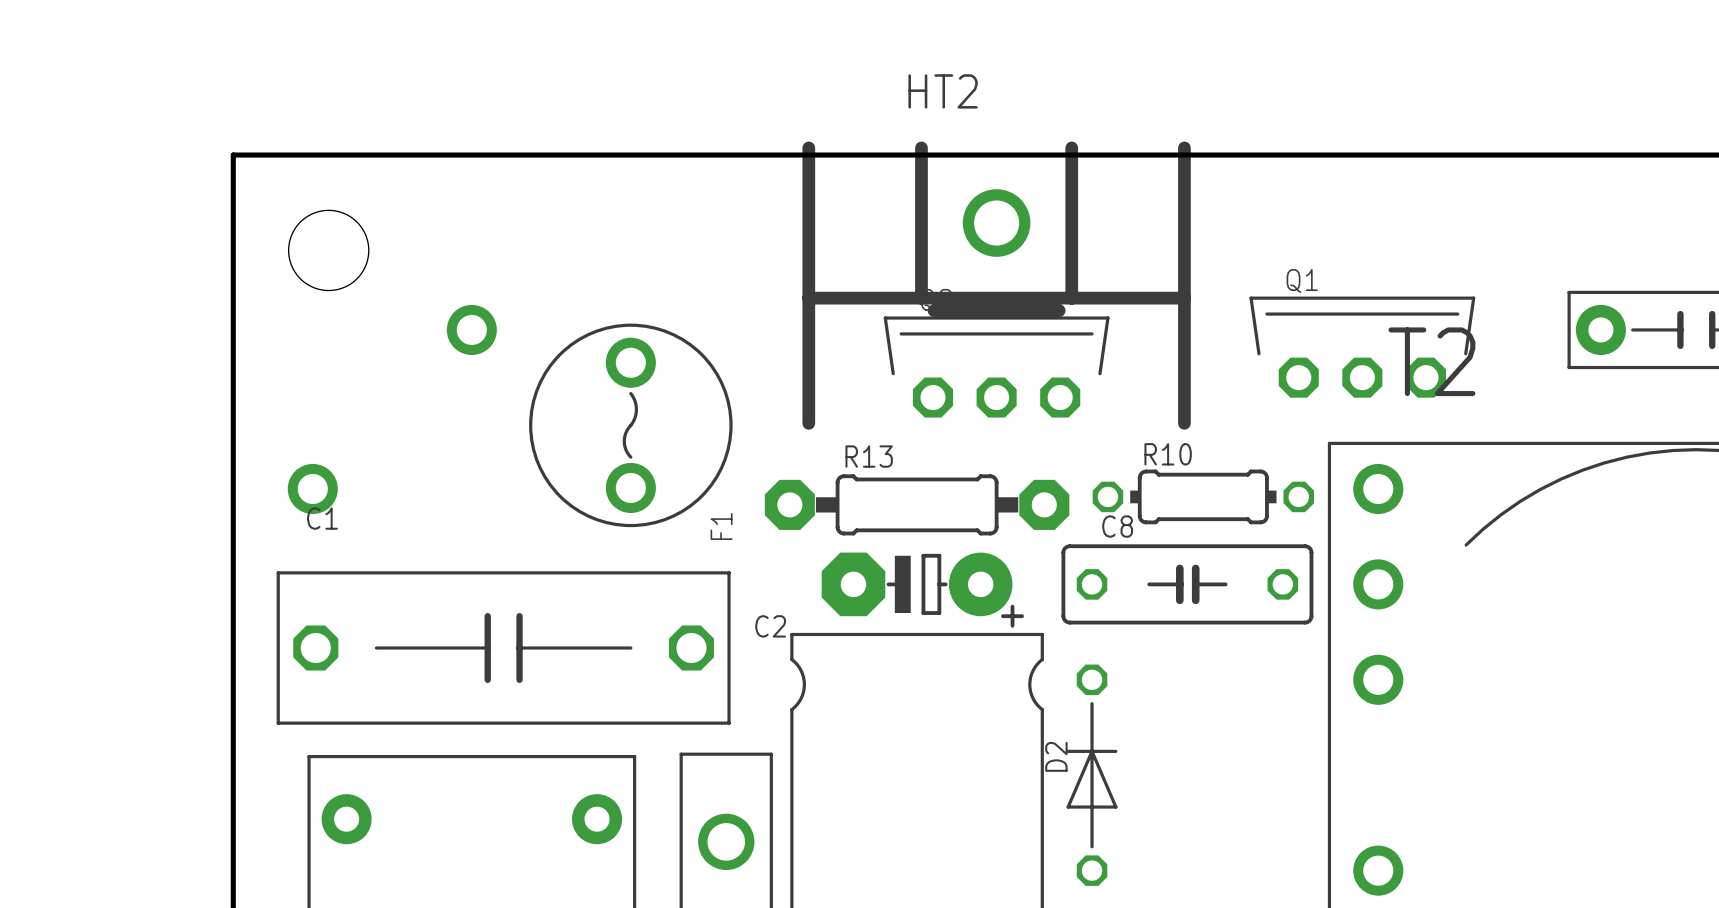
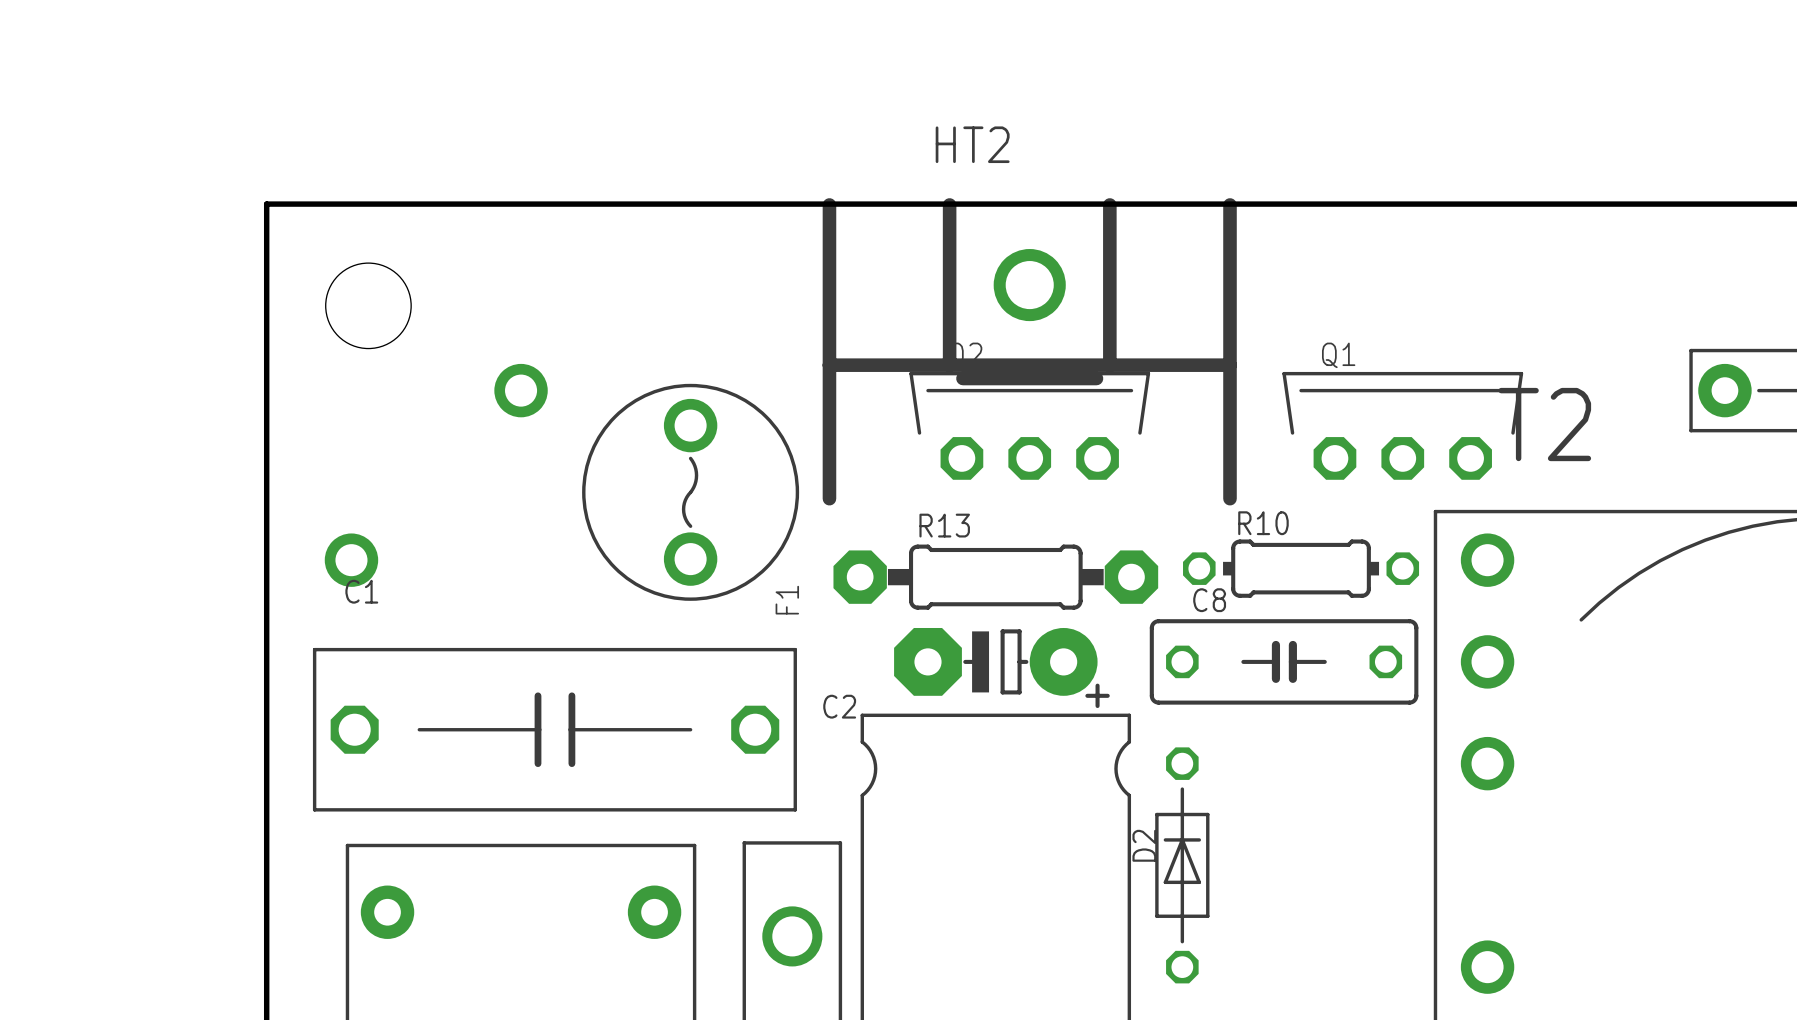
HT2 position: (996, 285) -> (1029, 351)
Q1 position: (1362, 347) -> (1402, 425)
part position: (996, 367) -> (1029, 425)
D2 footprint: [1066, 664, 1118, 886] -> [1155, 747, 1210, 984]

